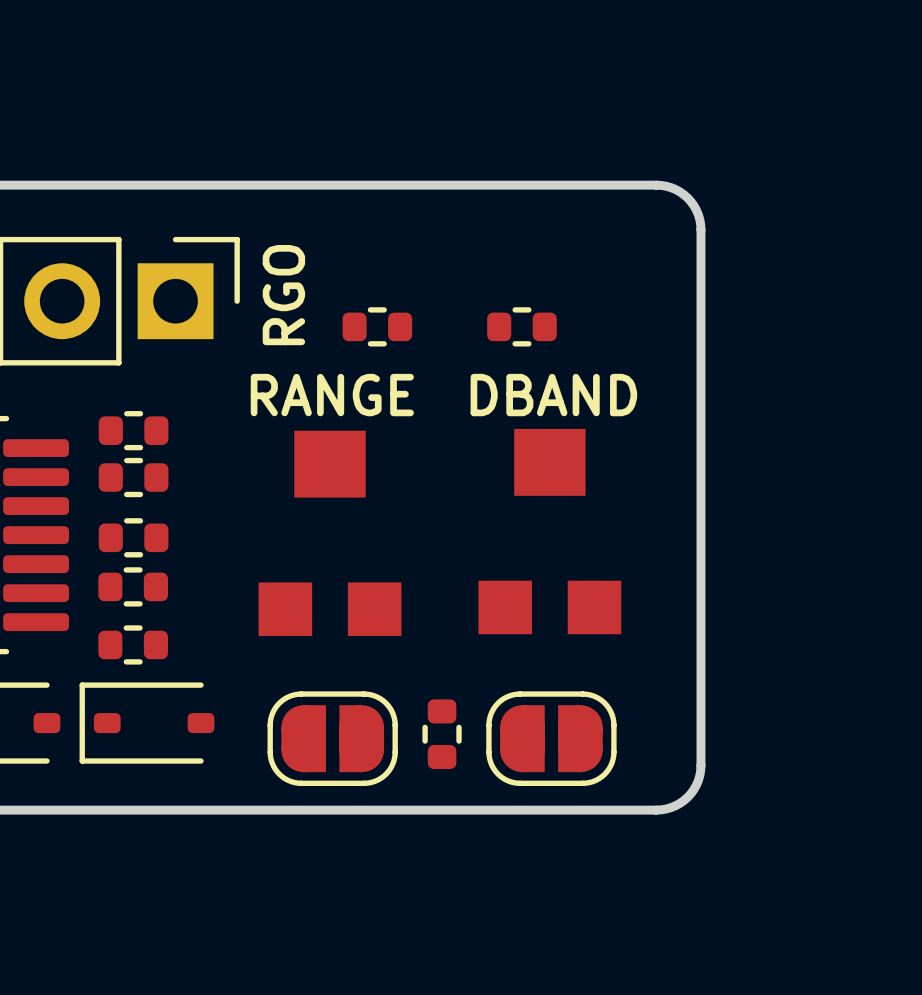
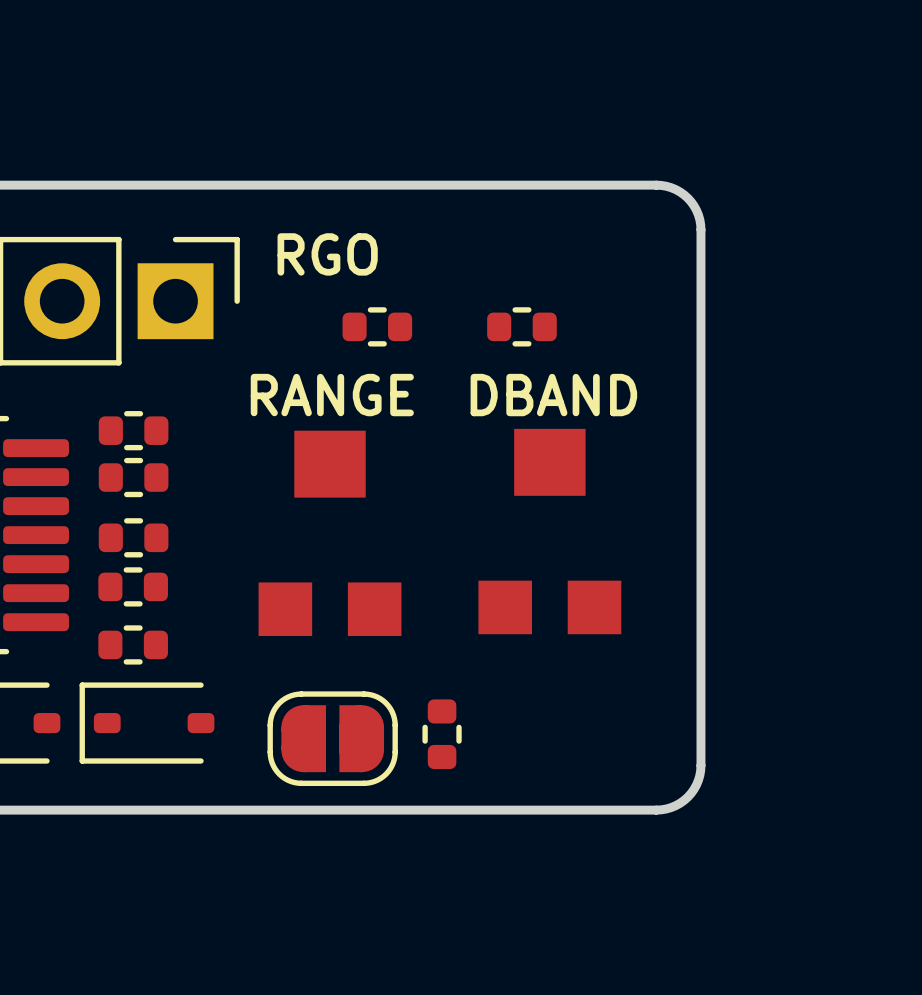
text rotation: 0° (283, 295) -> 90° clockwise (327, 254)
part: (551, 738) -> none

